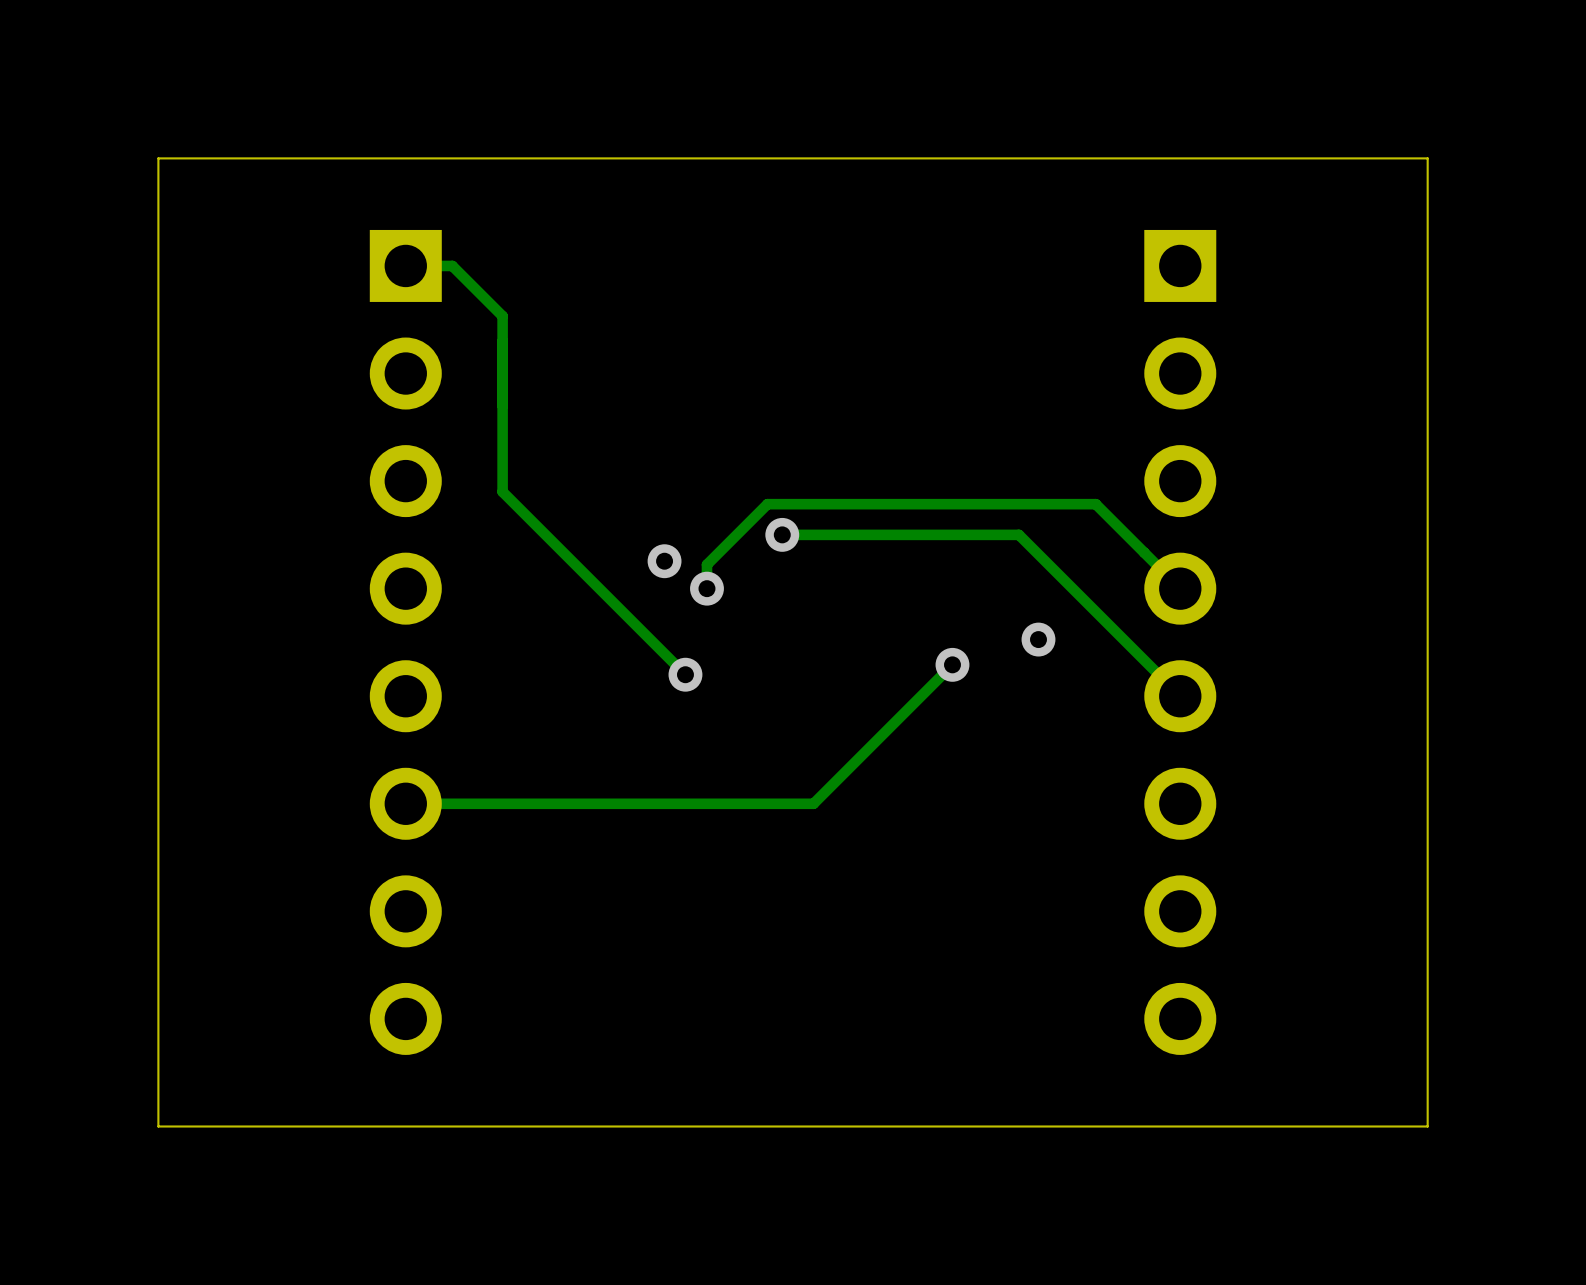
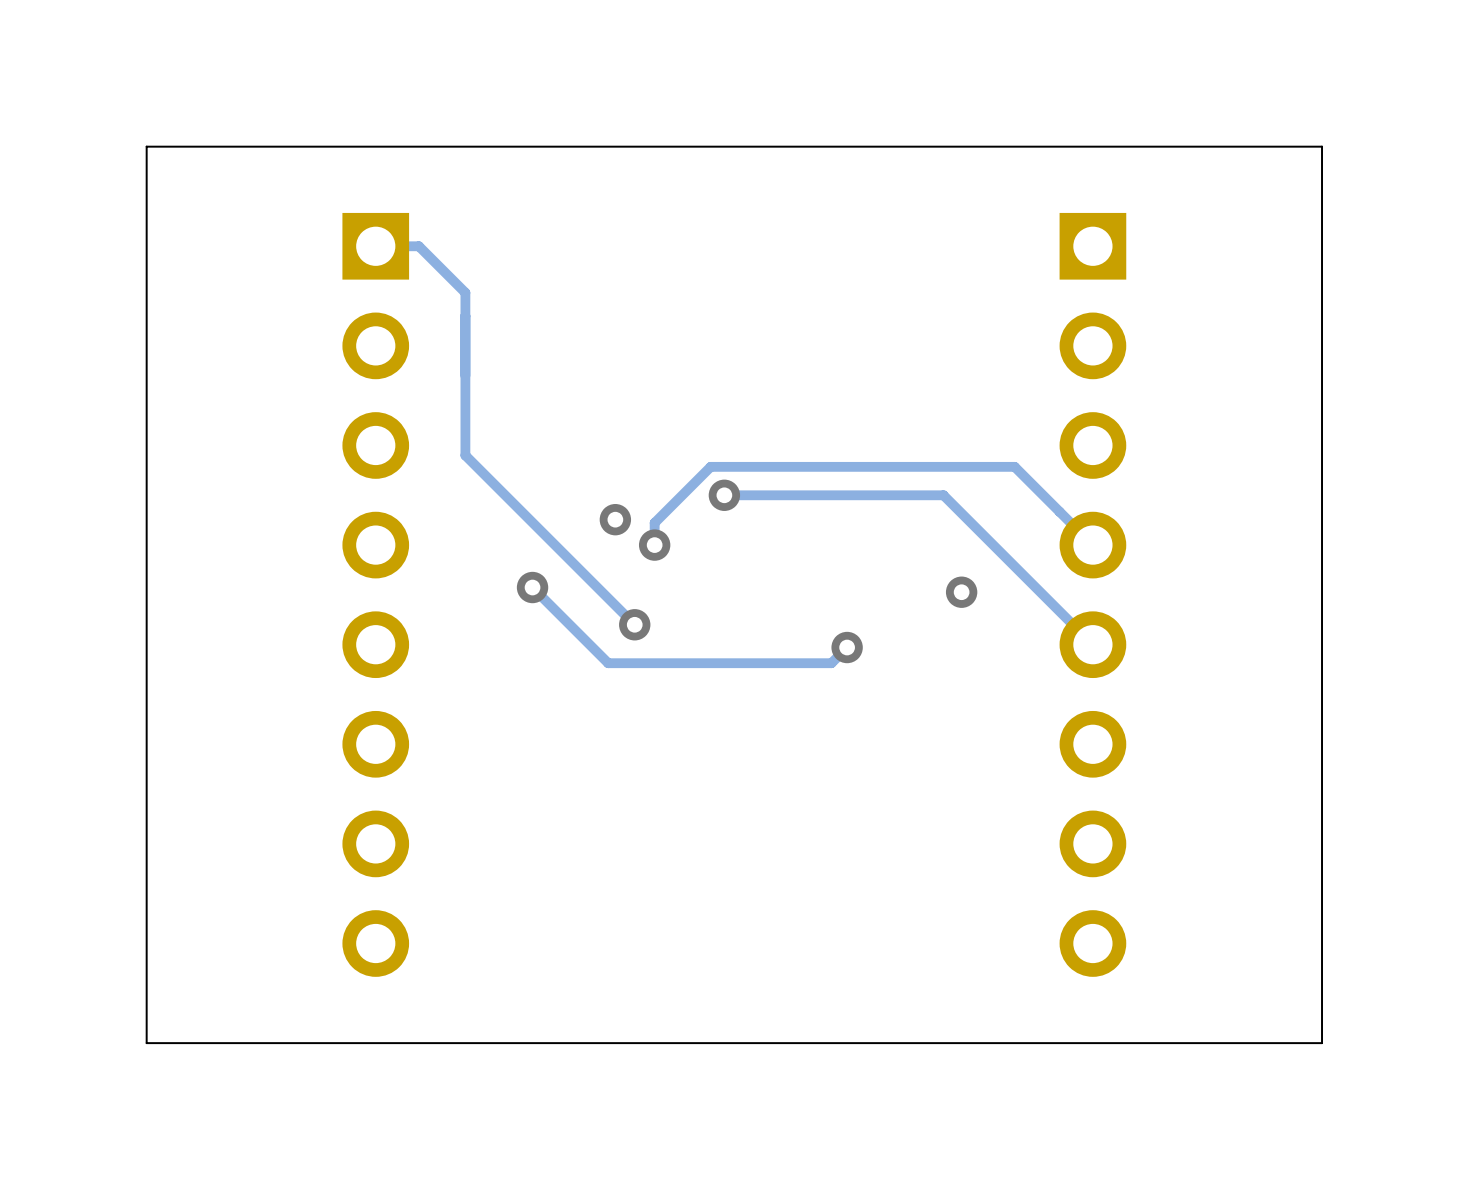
track: none -> (532, 587) (608, 663) (831, 663) (847, 647)
via: none -> (532, 587)
track: (952, 664) (813, 803) (405, 803) -> none
via position: (952, 664) -> (847, 647)

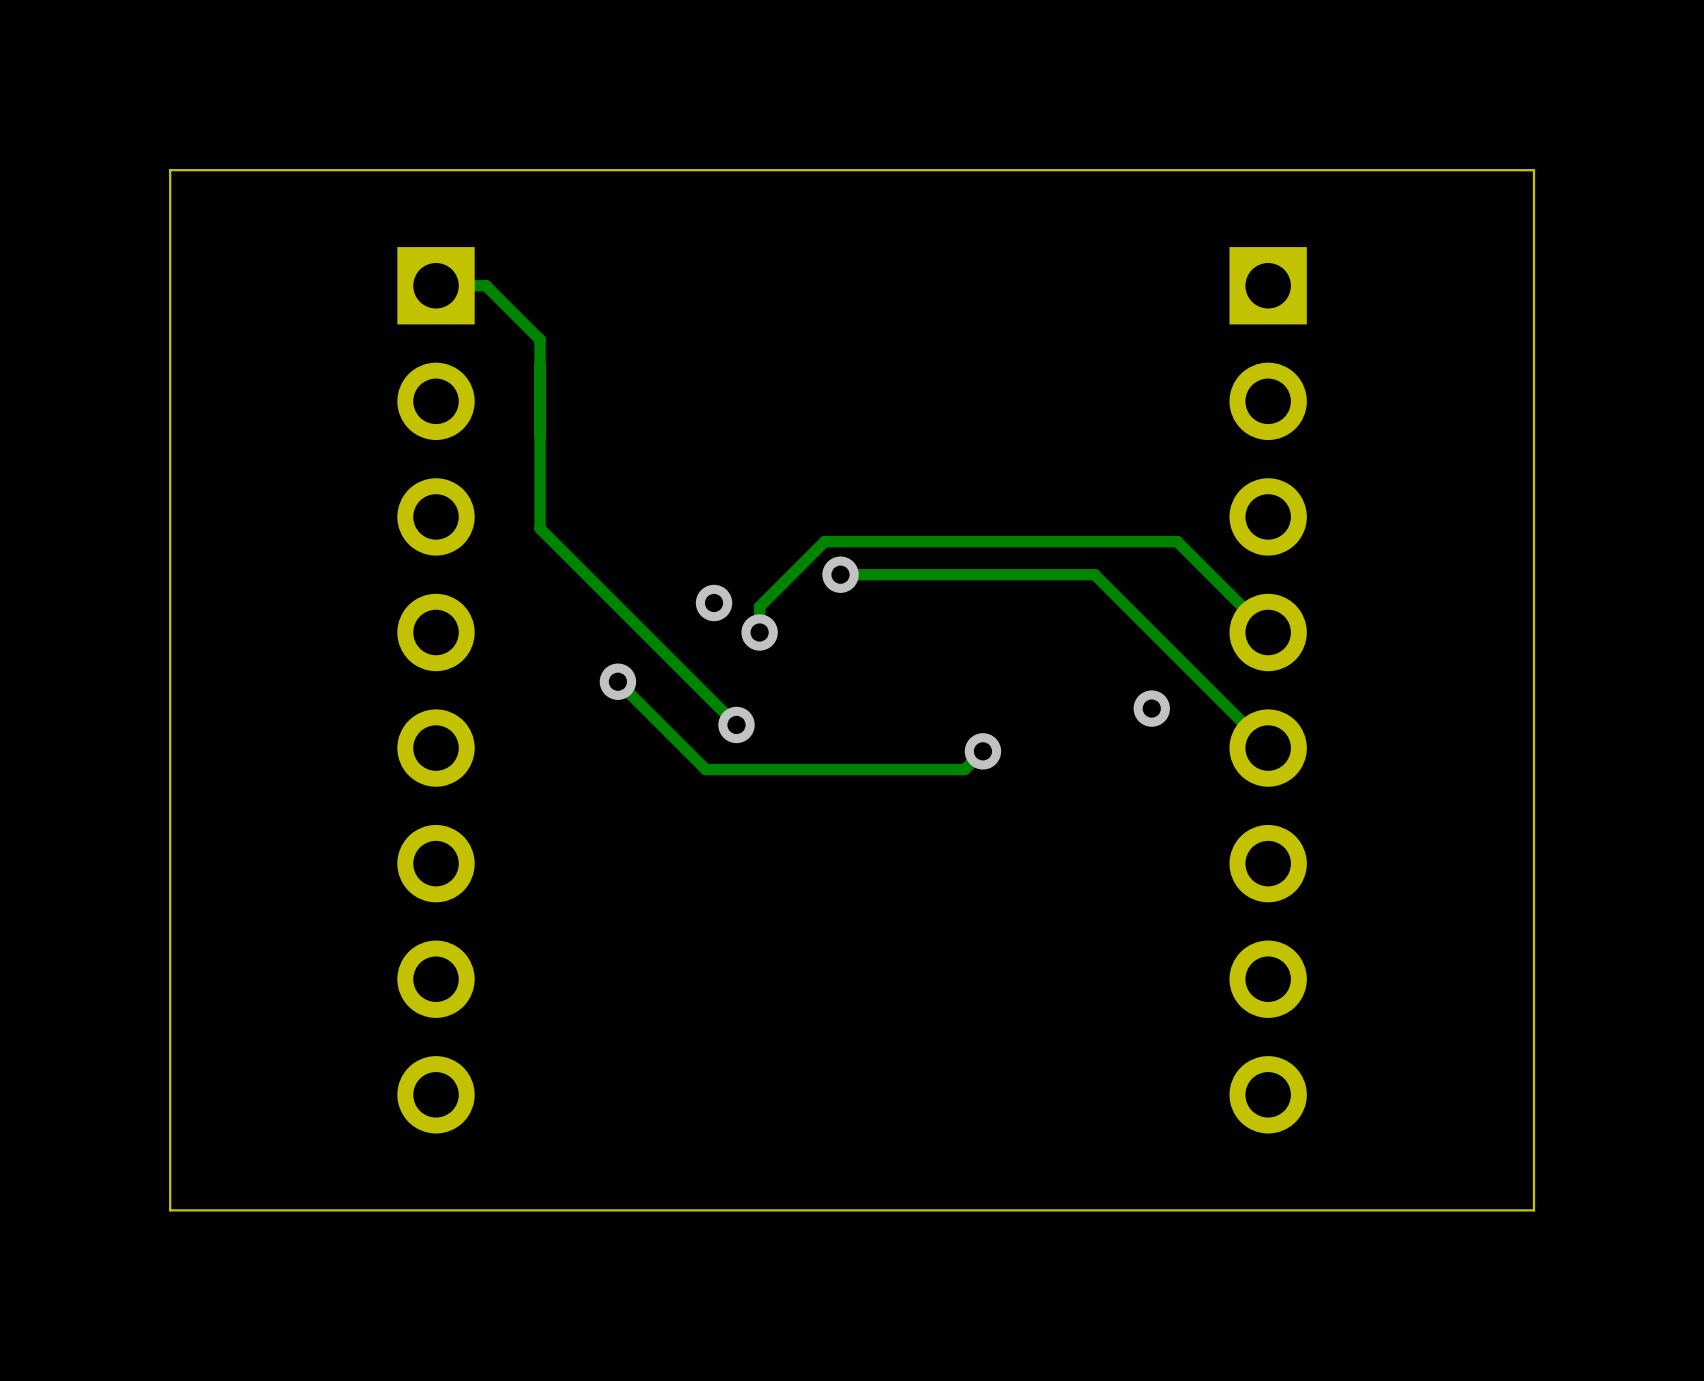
via position: (961, 592) -> (1151, 708)

